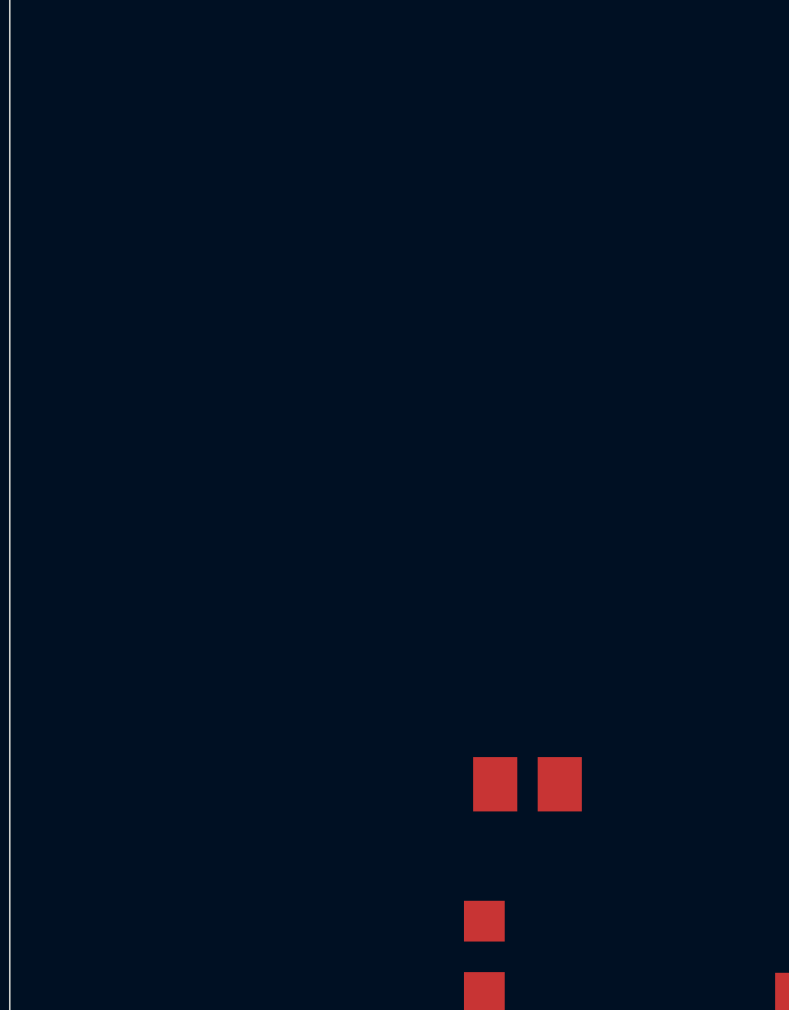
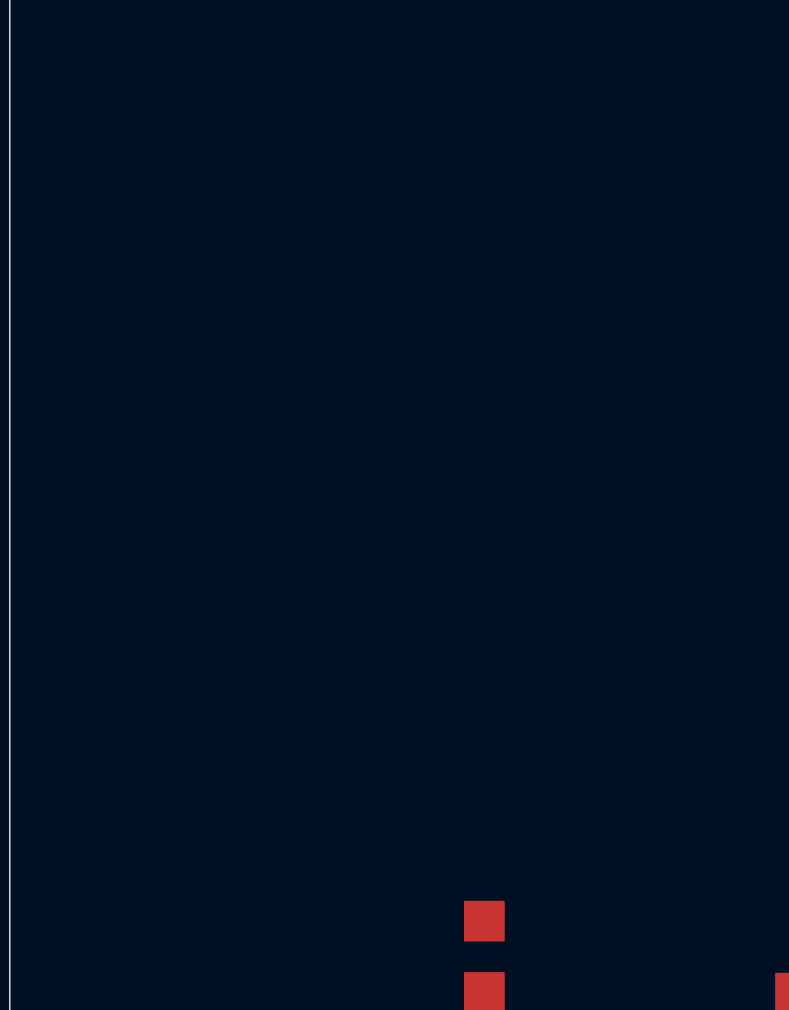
part: (527, 784) -> none

